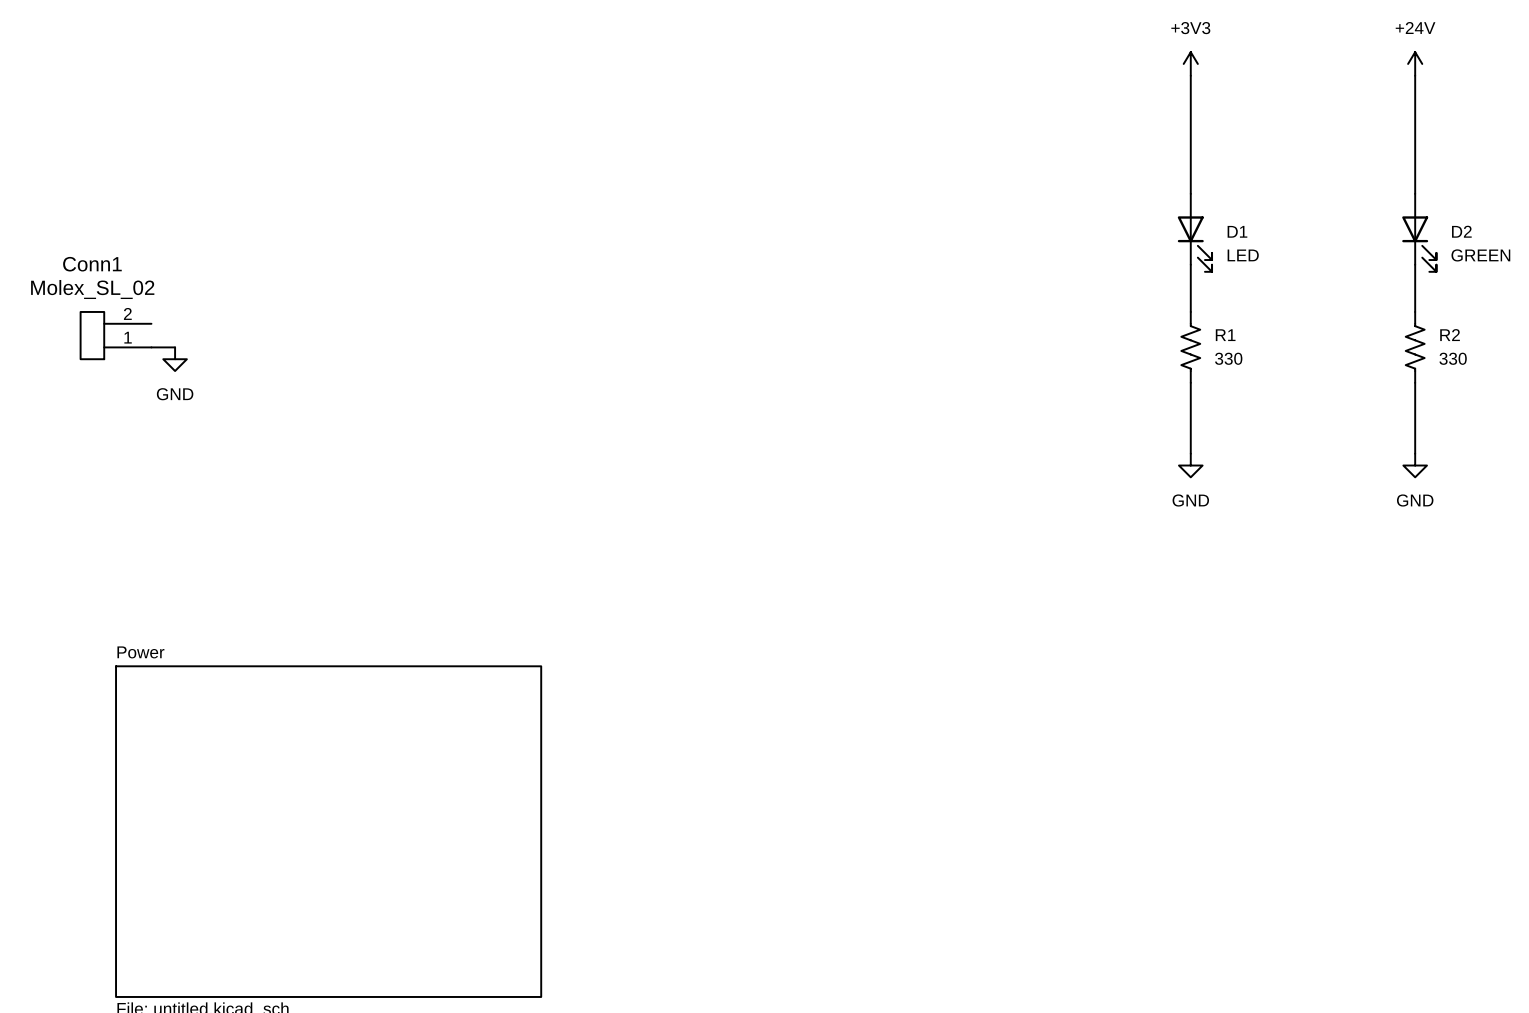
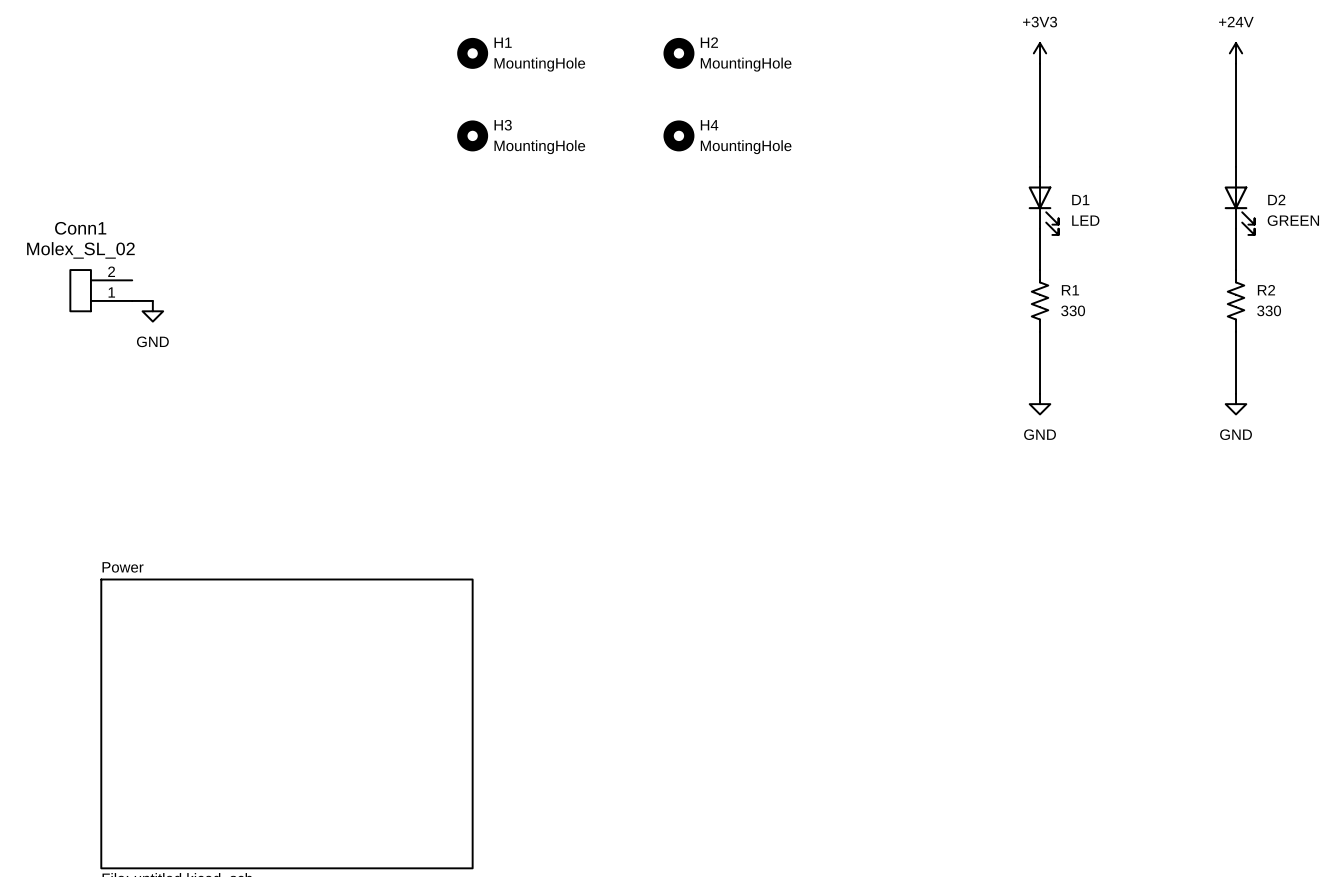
H1: none -> MountingHole (472, 53)
H2: none -> MountingHole (678, 53)
H3: none -> MountingHole (472, 135)
H4: none -> MountingHole (678, 135)

